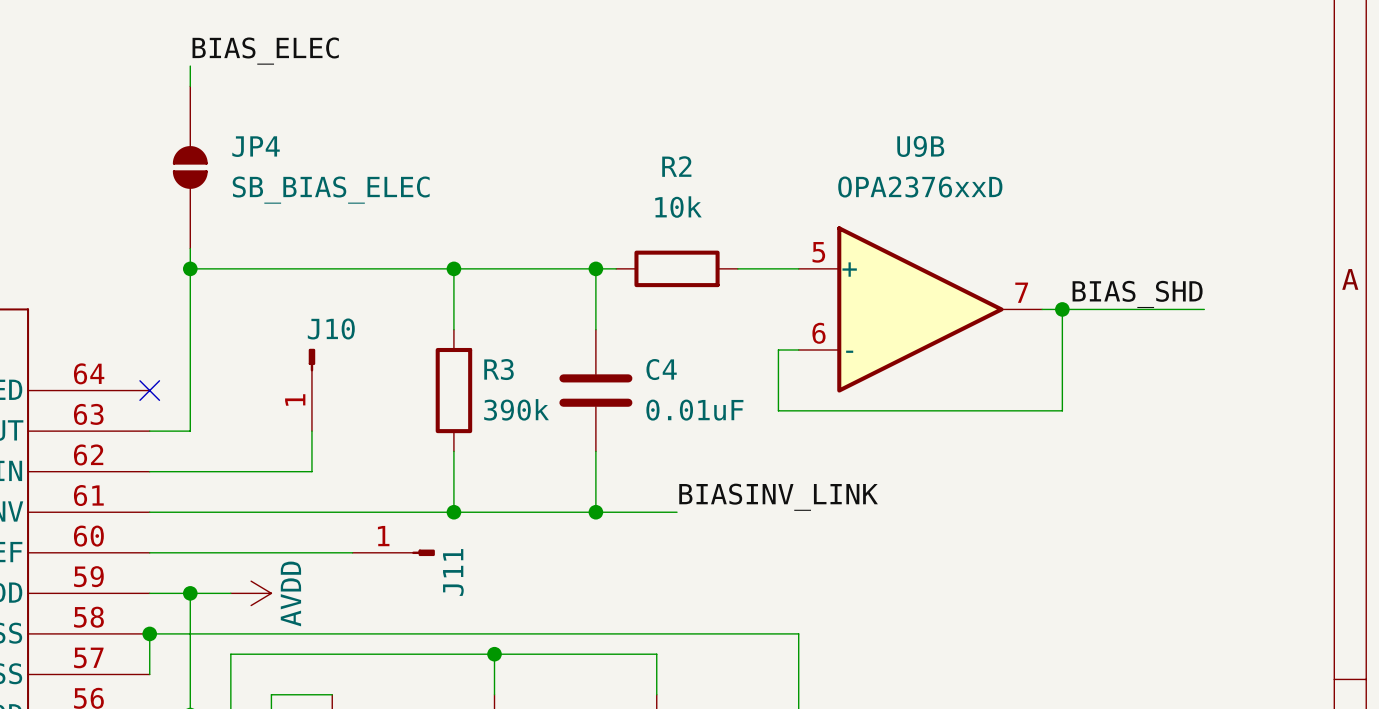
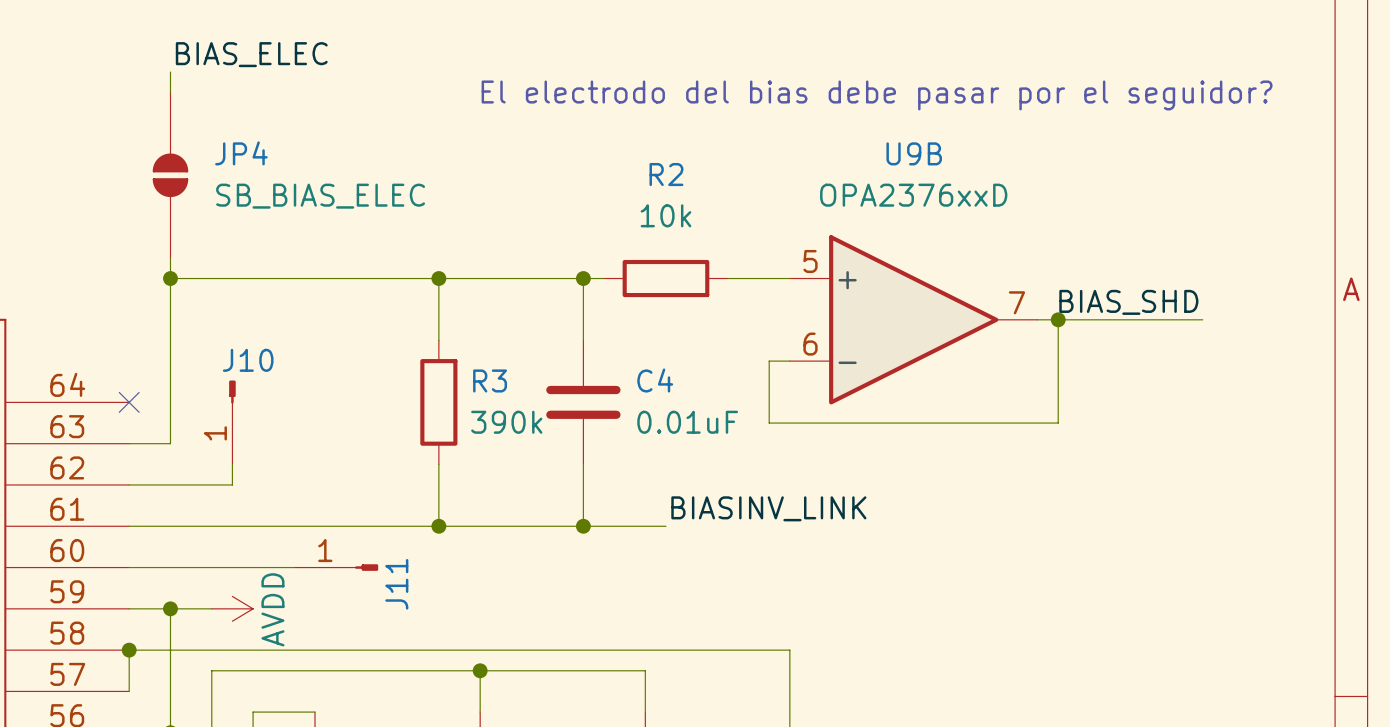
text: none -> El electrodo del bias debe pasar por el seguidor? (877, 95)
J10 position: (311, 389) -> (232, 422)
wire: (311, 431) (311, 471) (251, 471) -> (232, 464) (232, 484)
J11 position: (393, 552) -> (336, 567)

